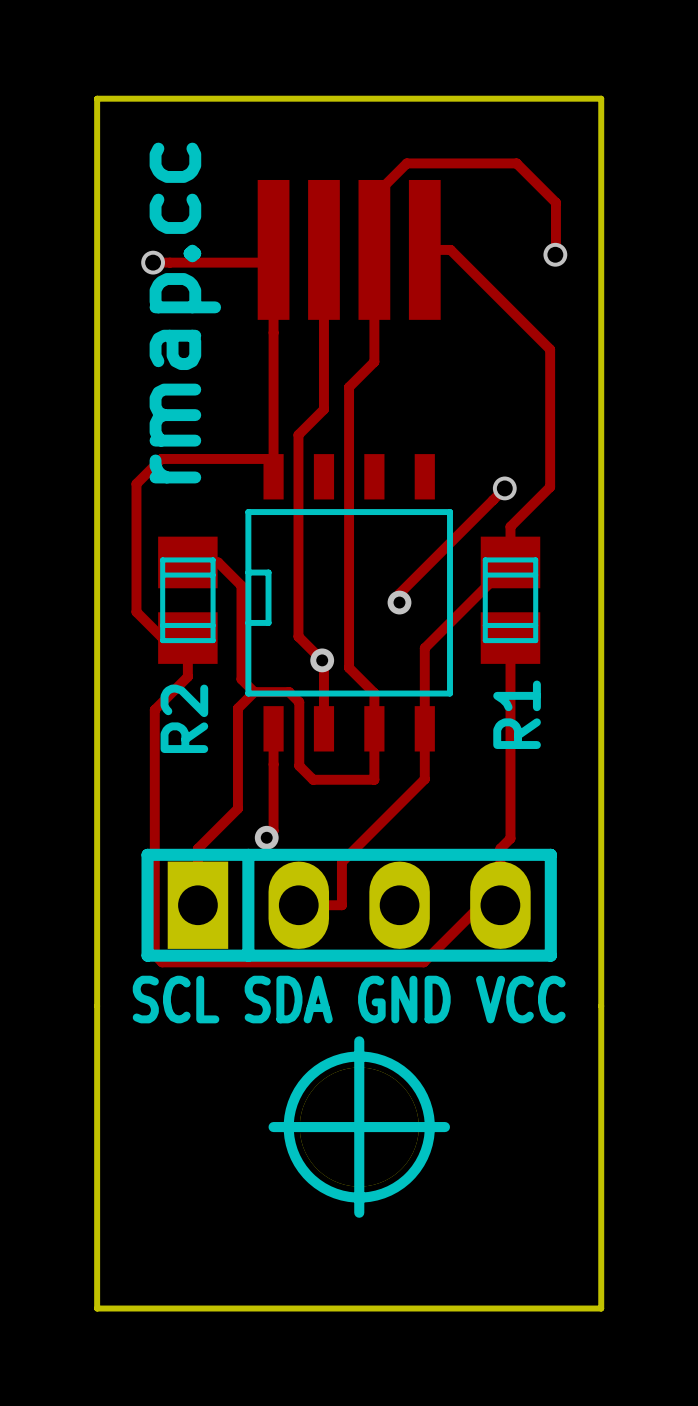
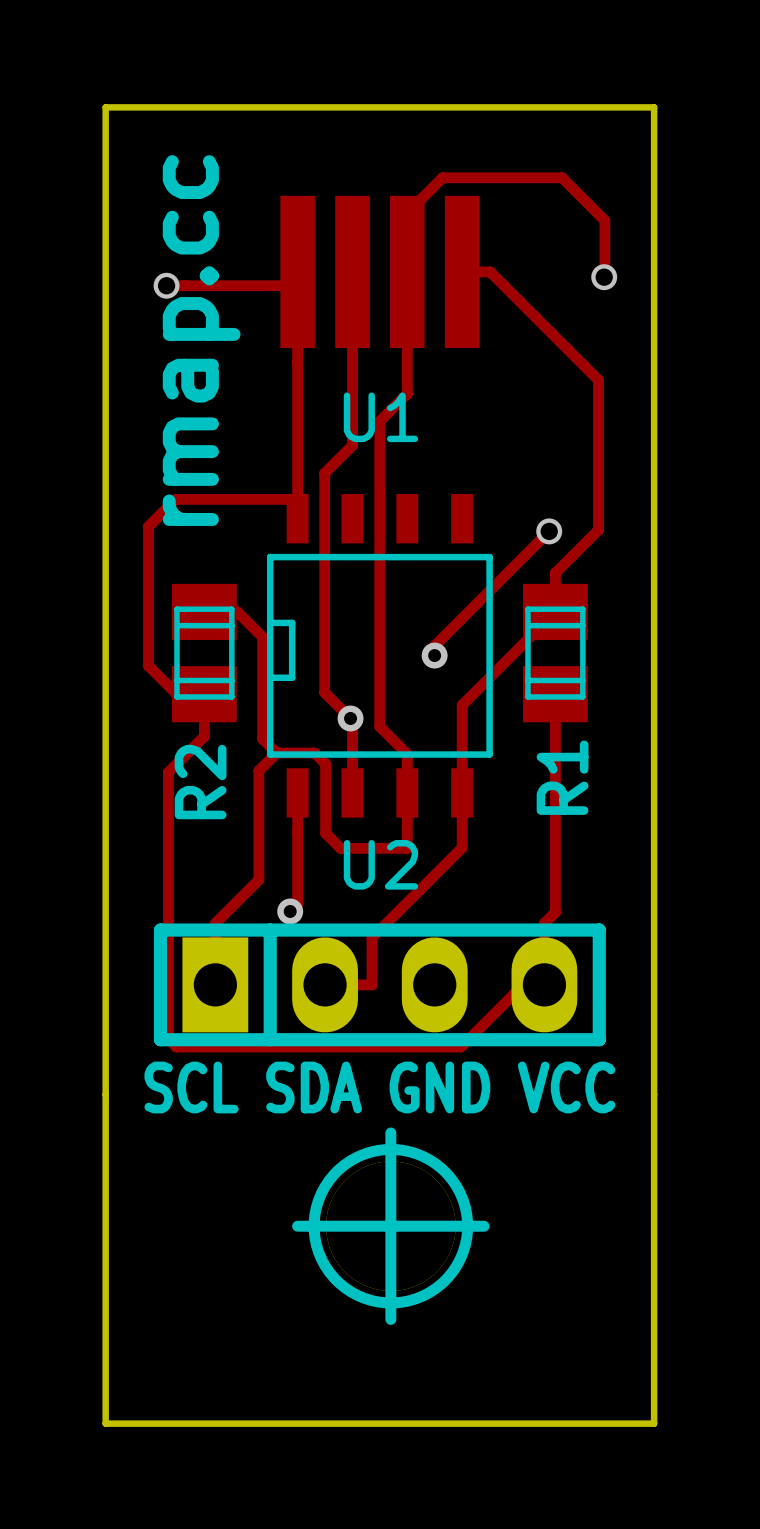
U1 name: none -> U1 (380, 417)
U2 name: none -> U2 (380, 864)

